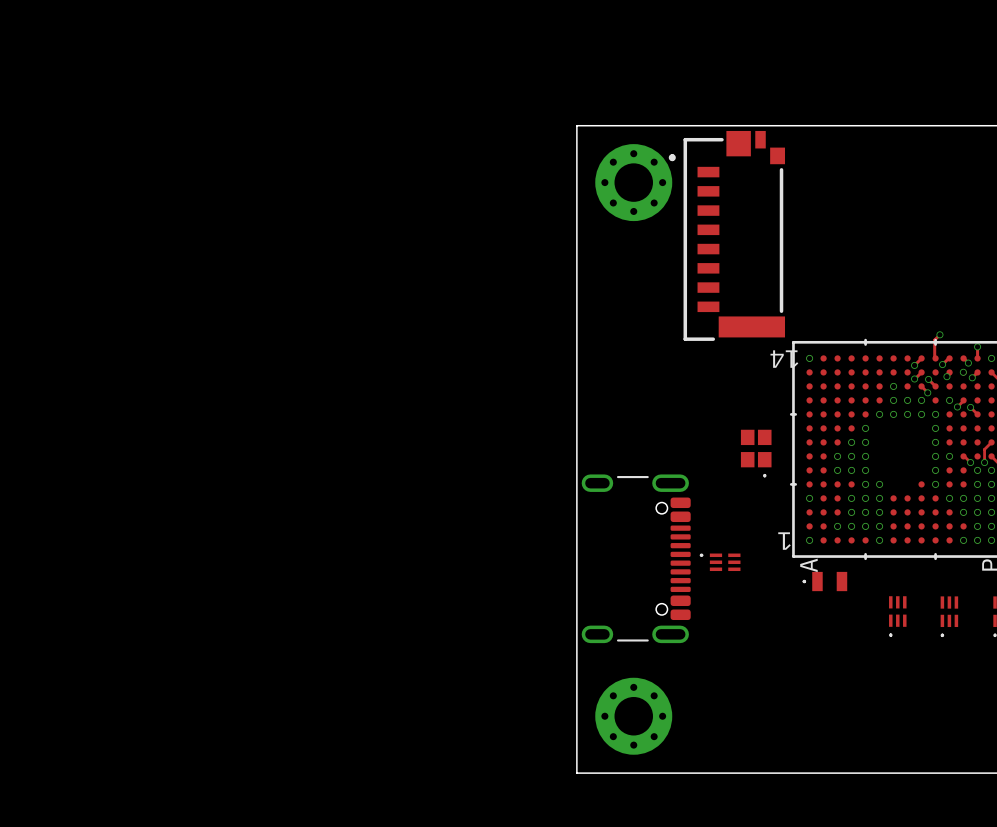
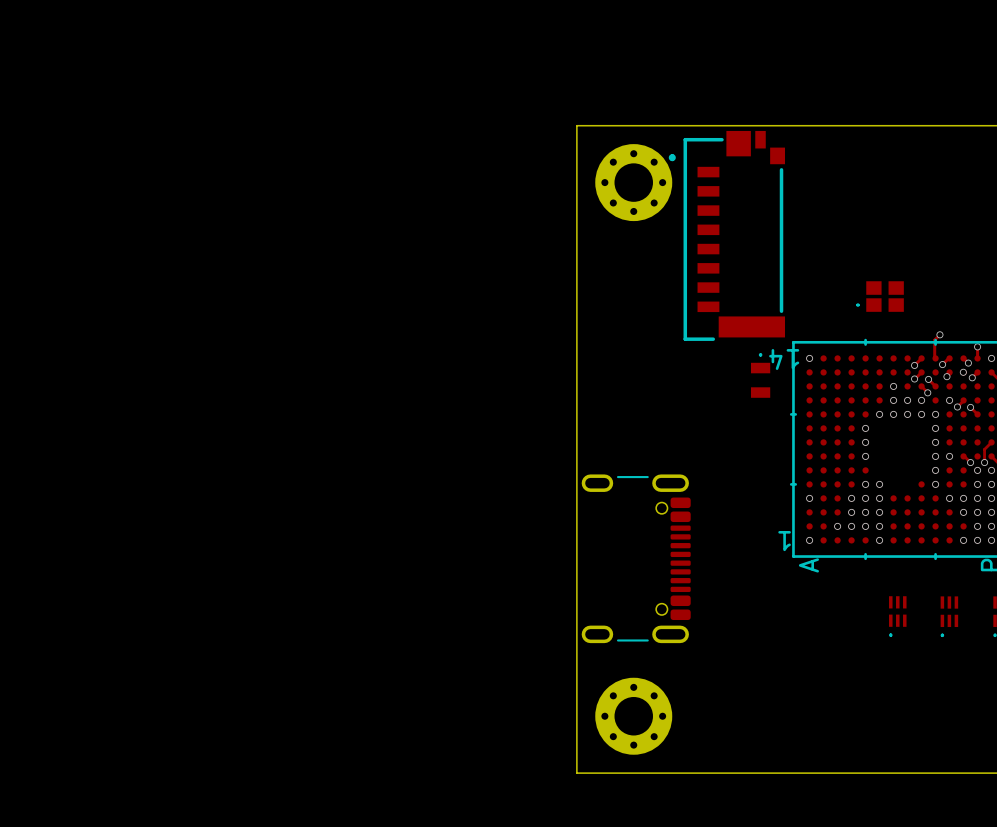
via: (851, 442) -> none
part rotation: 0° (756, 453) -> 90° clockwise (880, 296)
part position: (756, 453) -> (880, 296)
via: (837, 456) -> none
via: (851, 456) -> none
via: (837, 470) -> none
via: (851, 470) -> none
via: (865, 470) -> none
part: (720, 562) -> none
part rotation: 0° (824, 581) -> 90° clockwise (760, 375)
part position: (824, 581) -> (760, 375)

